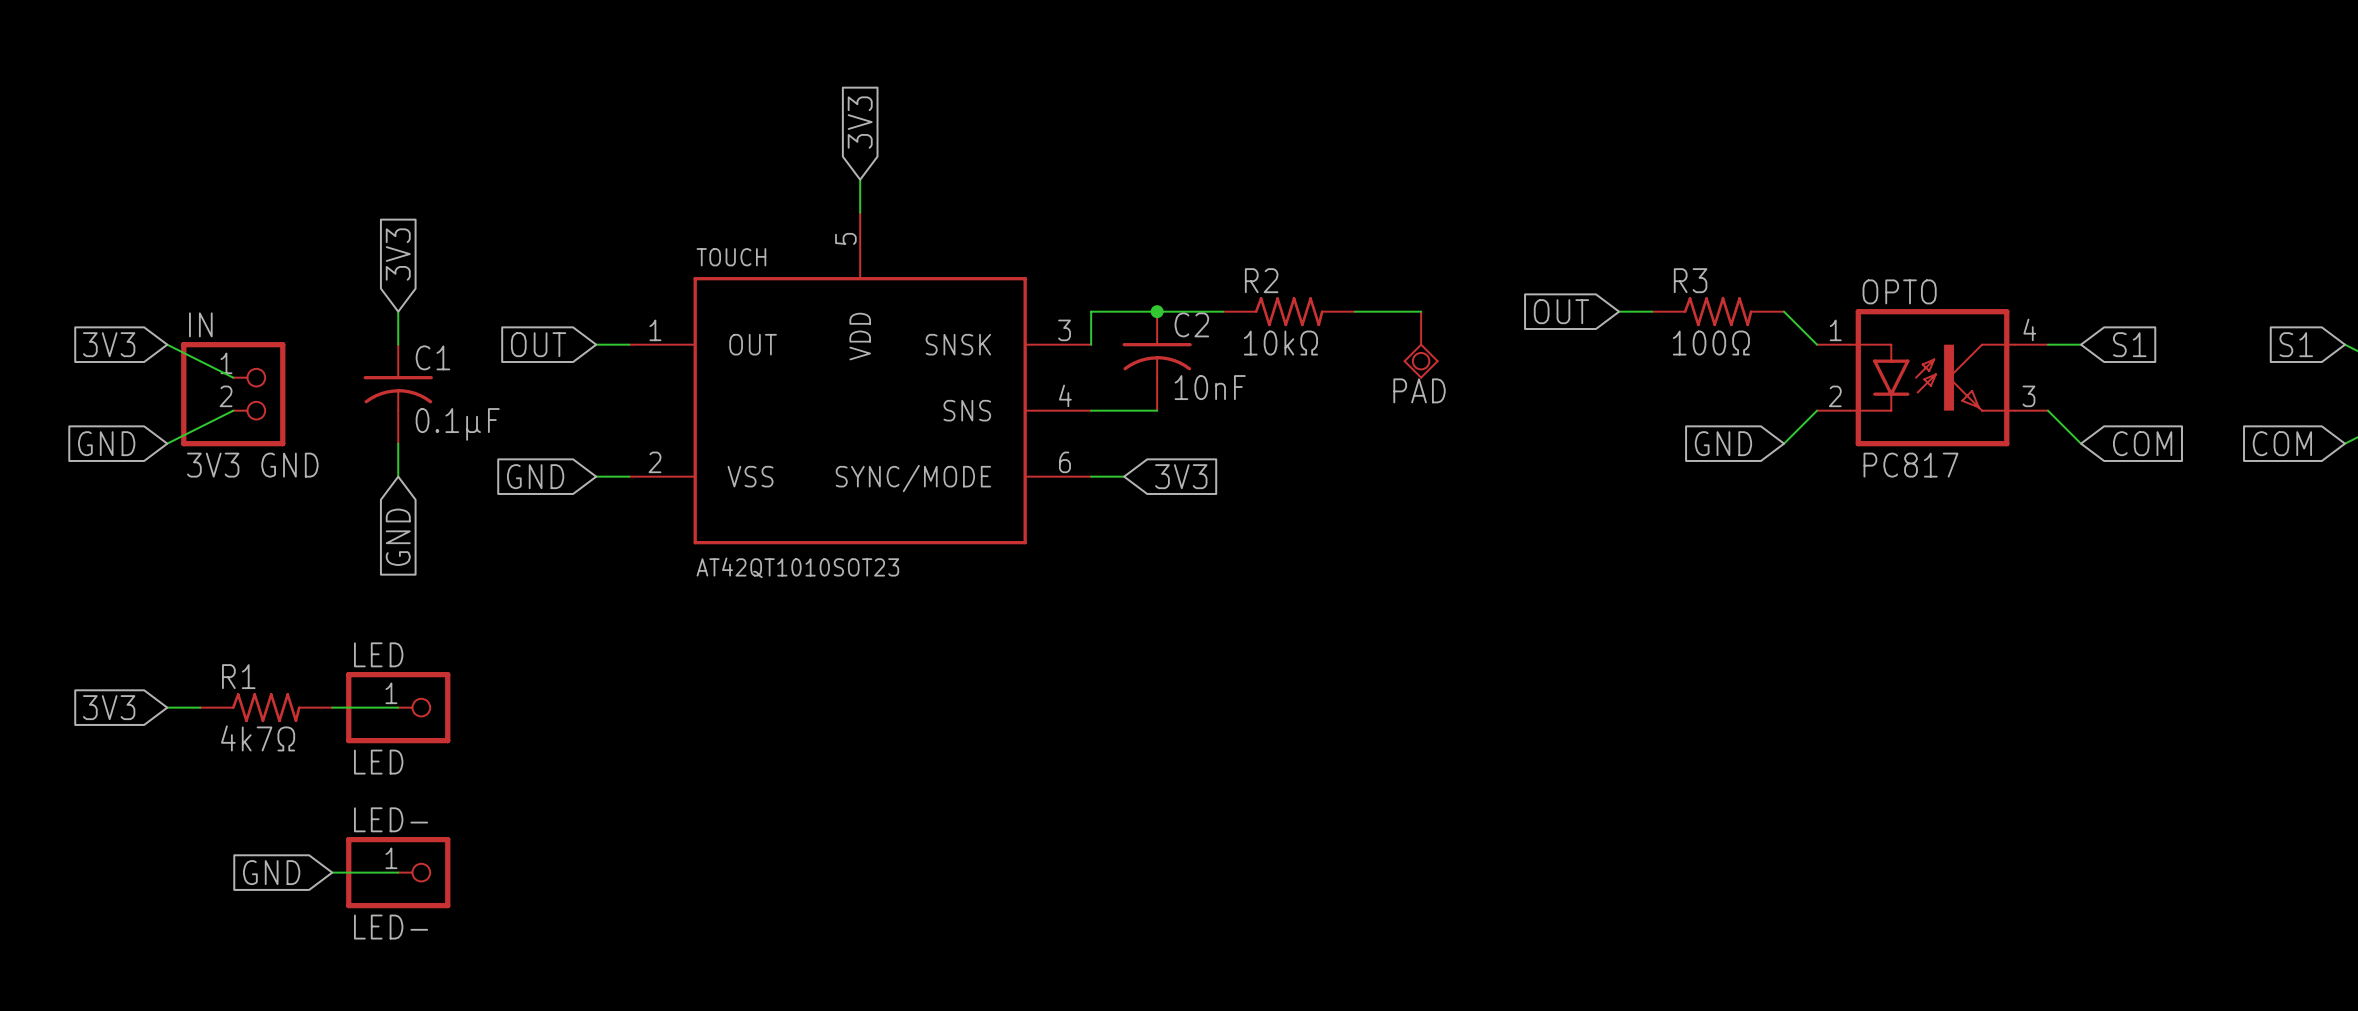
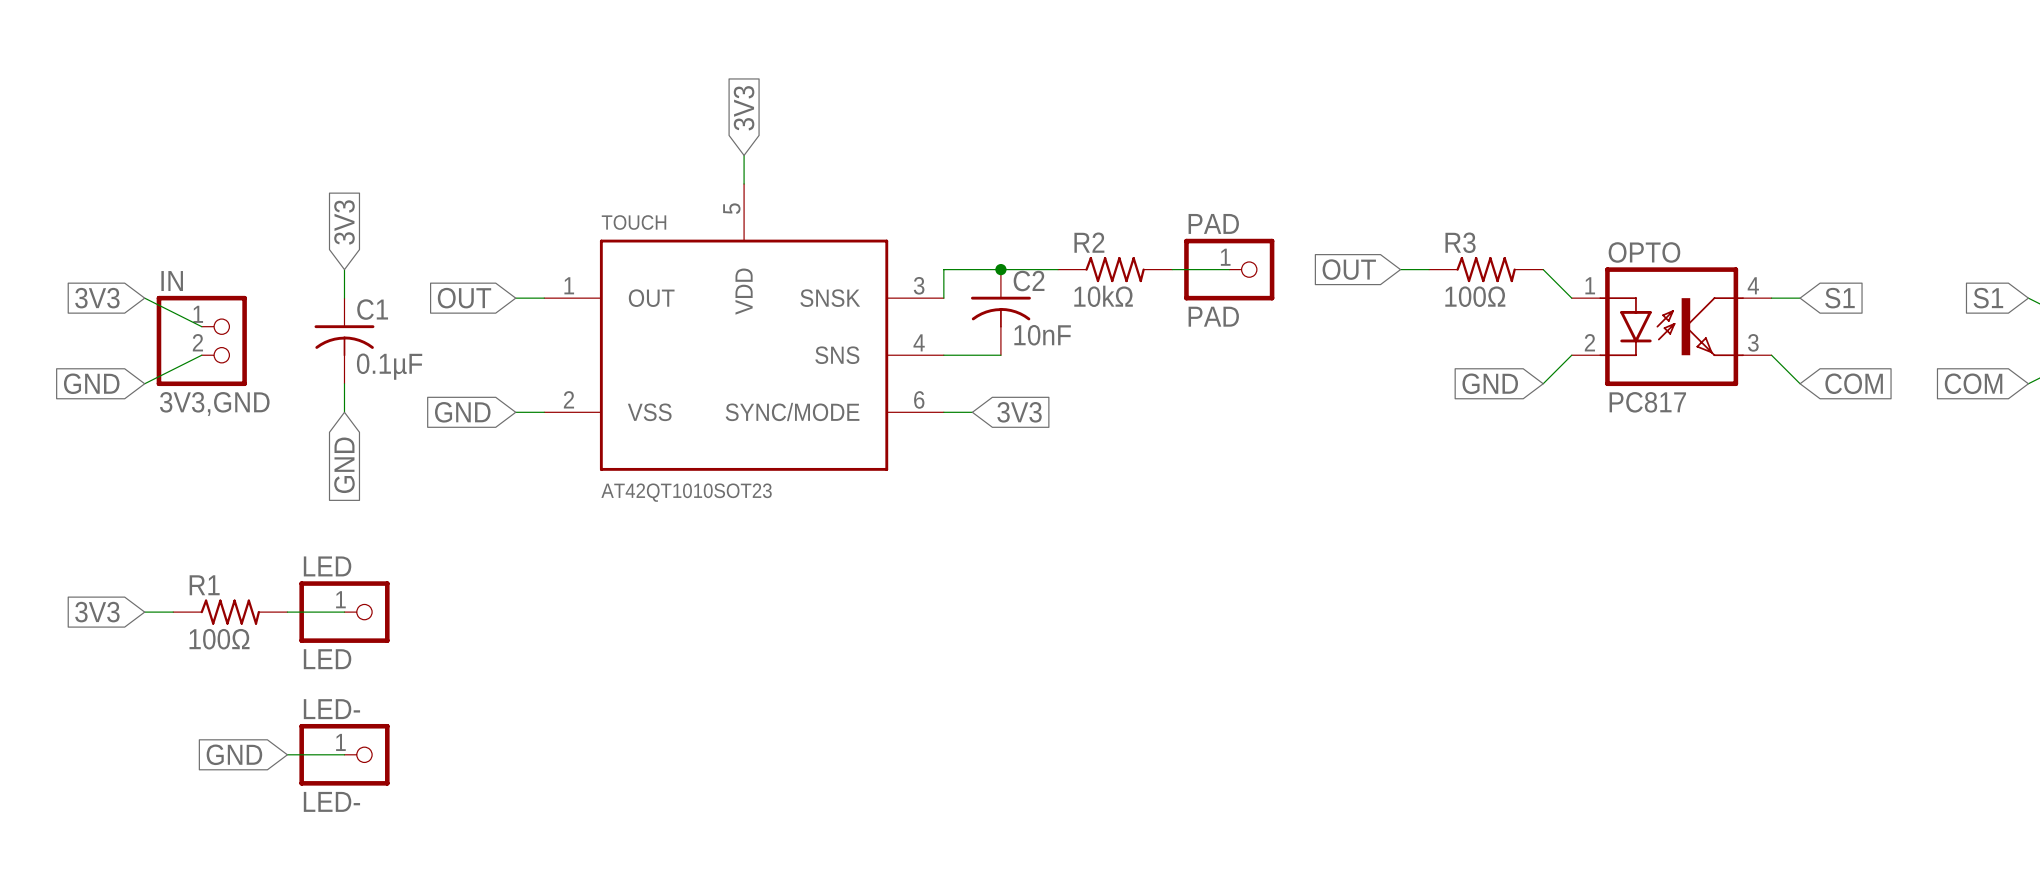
PAD: none -> PAD (1229, 269)
PAD: (1421, 345) -> none
IN value: 3V3 GND (252, 465) -> 3V3,GND (214, 404)
R1 value: 4k7Ω (258, 738) -> 100Ω (219, 639)

